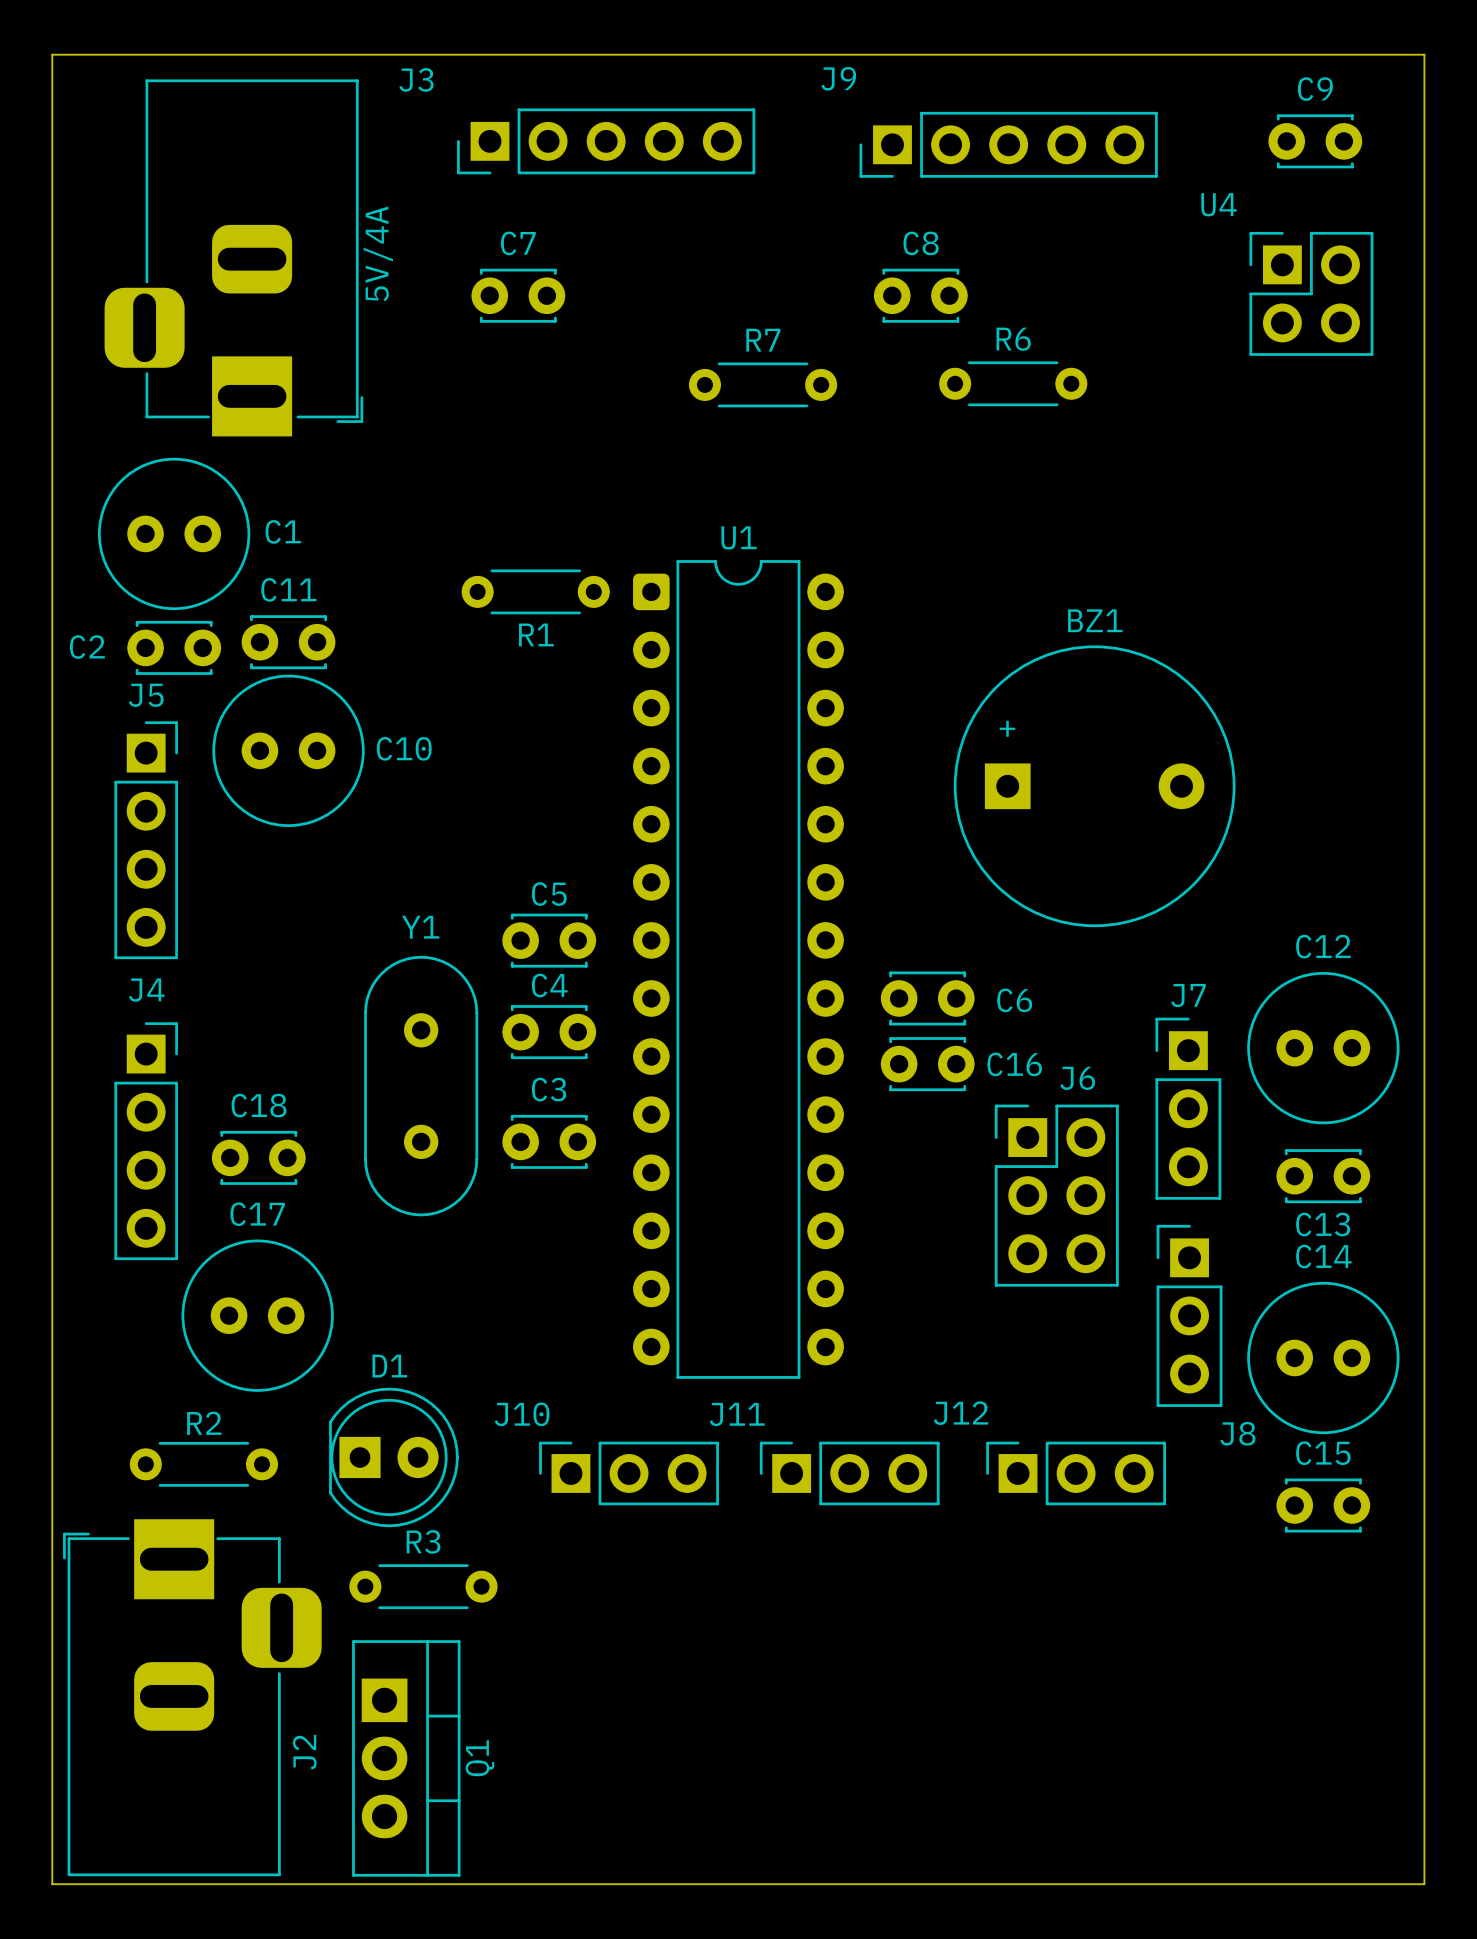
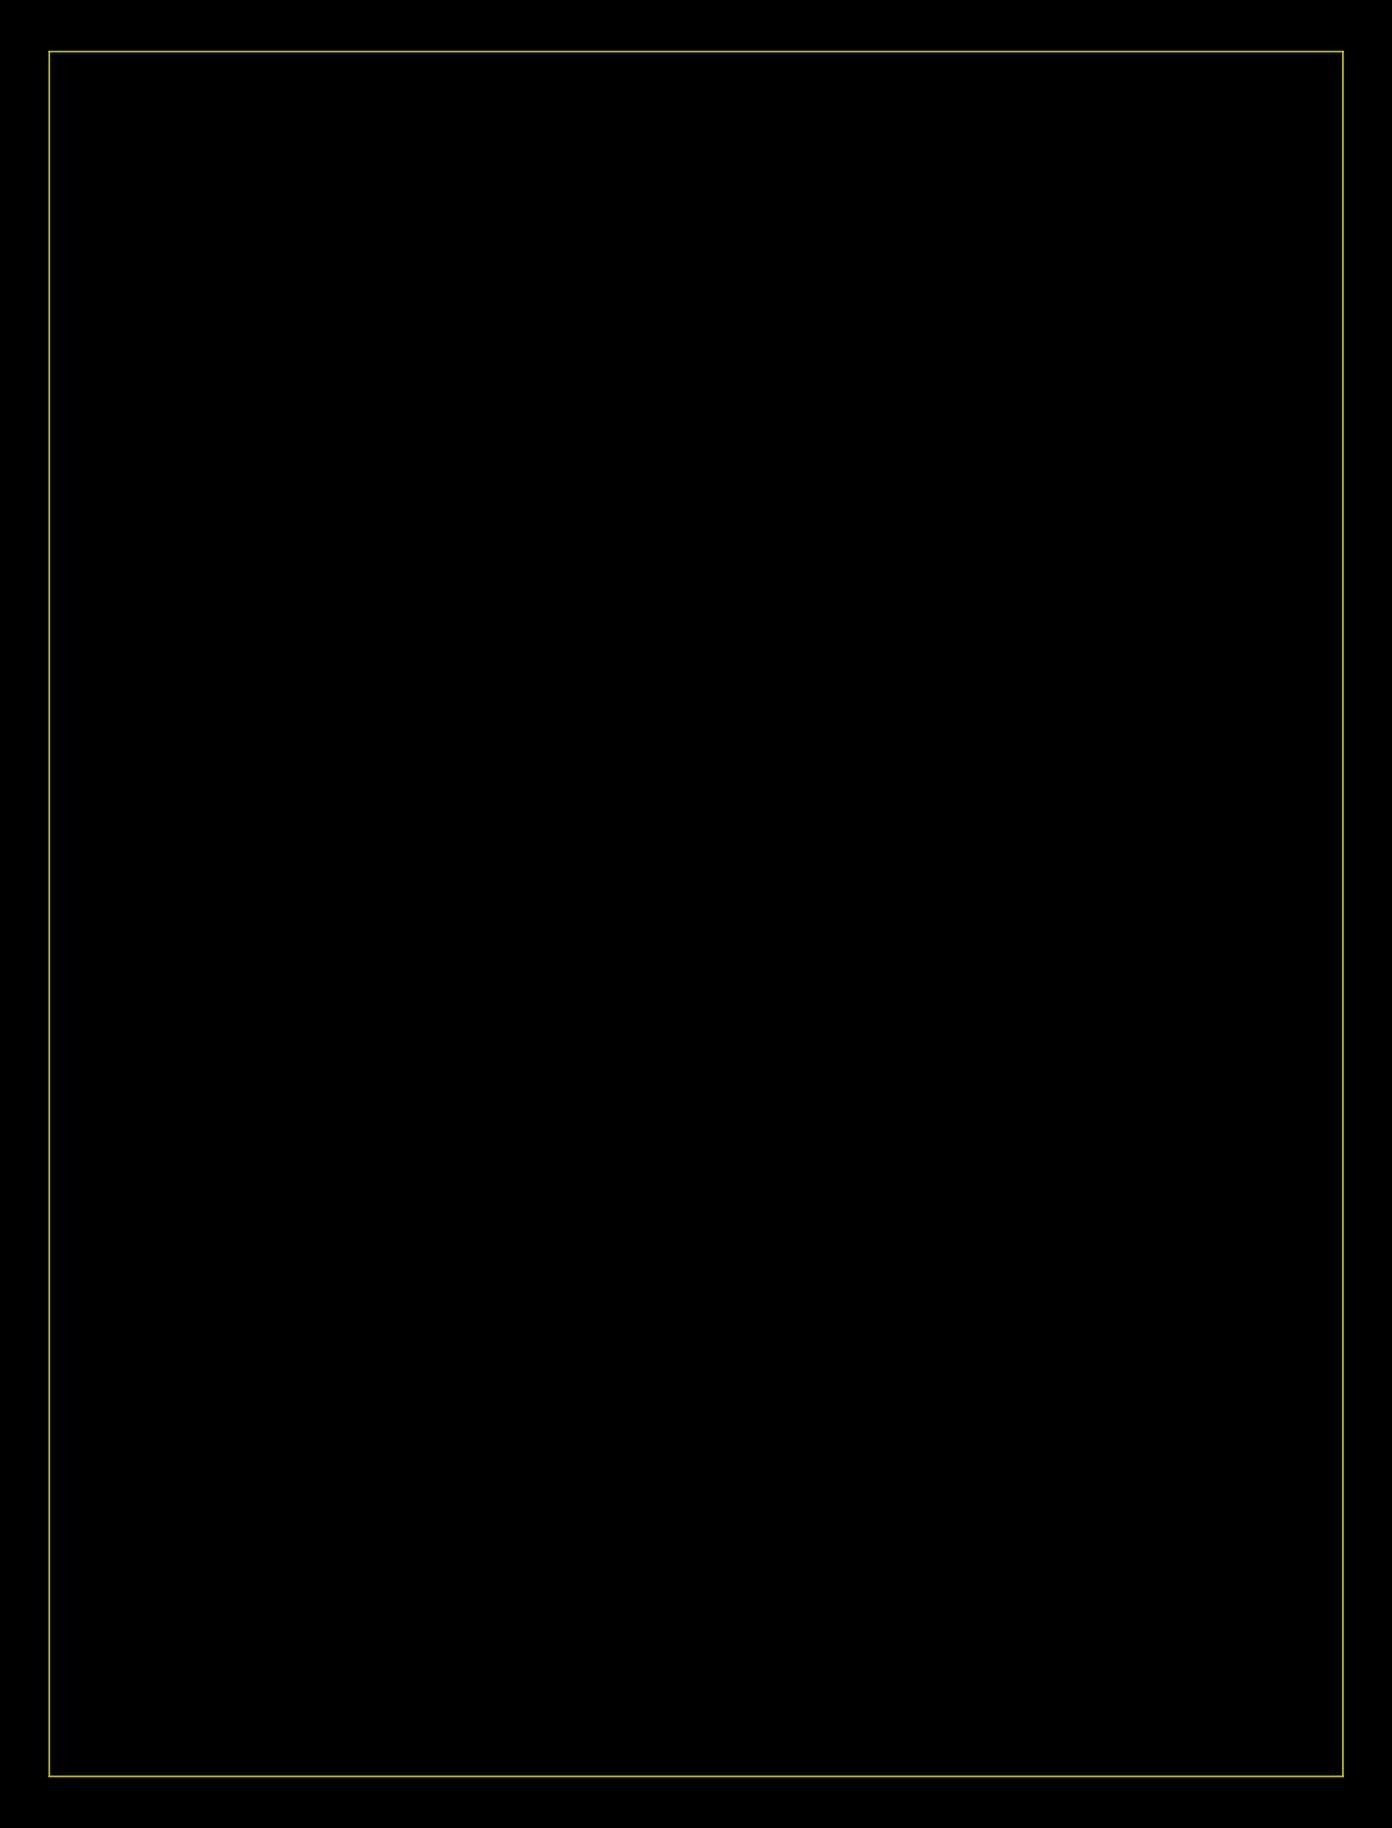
J3: (606, 141) -> none
C9: (1315, 141) -> none
J9: (1008, 144) -> none
part: 5V/4A (233, 257) -> none
U4: (1311, 293) -> none
C7: (518, 295) -> none
C8: (920, 295) -> none
R6: (1013, 383) -> none
R7: (763, 384) -> none
C1: (174, 533) -> none
R1: (535, 591) -> none
C11: (288, 642) -> none
C2: (174, 647) -> none
C10: (288, 750) -> none
BZ1: (1094, 786) -> none
J5: (146, 840) -> none
C5: (549, 940) -> none
U1: (738, 969) -> none
C6: (927, 998) -> none
C4: (549, 1032) -> none
C12: (1323, 1048) -> none
C16: (927, 1064) -> none
Y1: (421, 1086) -> none
J7: (1188, 1108) -> none
J4: (146, 1141) -> none
C3: (549, 1141) -> none
C18: (258, 1157) -> none
C13: (1323, 1176) -> none
J6: (1056, 1195) -> none
C17: (257, 1315) -> none
J8: (1189, 1315) -> none
C14: (1323, 1357) -> none
D1: (393, 1457) -> none
R2: (203, 1464) -> none
J10: (629, 1473) -> none
J11: (849, 1473) -> none
J12: (1076, 1473) -> none
C15: (1323, 1505) -> none
R3: (423, 1586) -> none
J2: (192, 1697) -> none
Q1: (406, 1758) -> none

